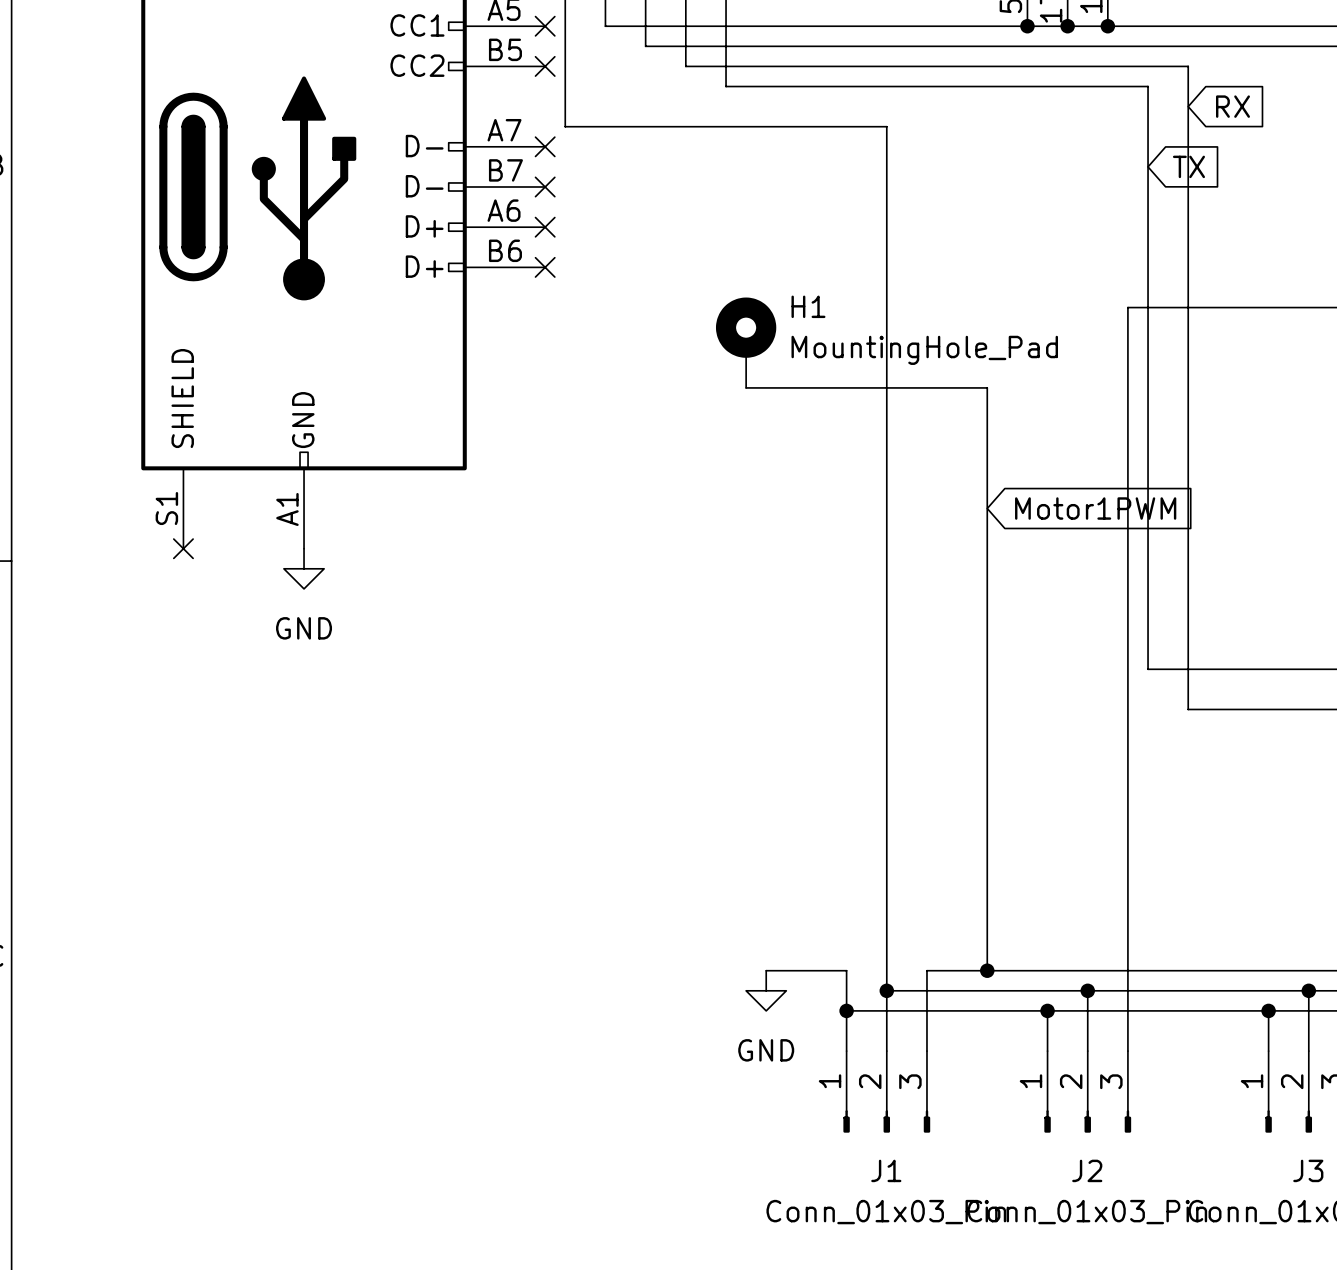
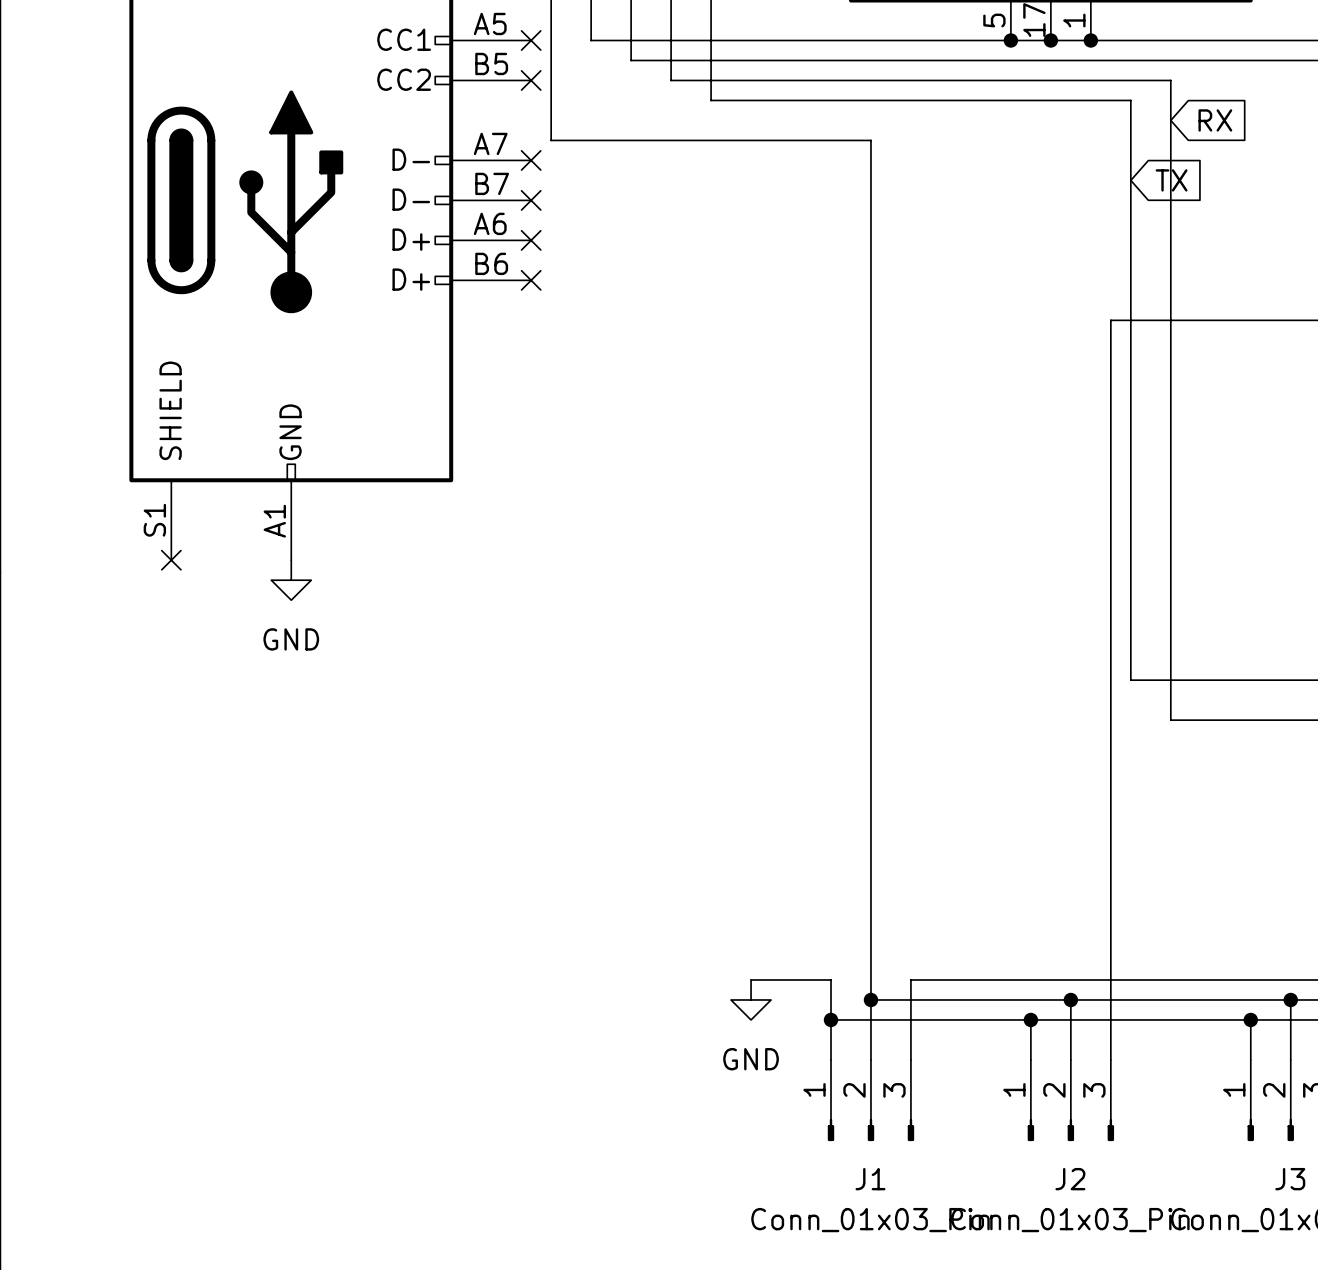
H1: MountingHole_Pad (746, 342) -> none
wire: (746, 387) (987, 387) (987, 970) -> none
global label: Motor1PWM (1095, 508) -> none
junction: (987, 970) -> none

